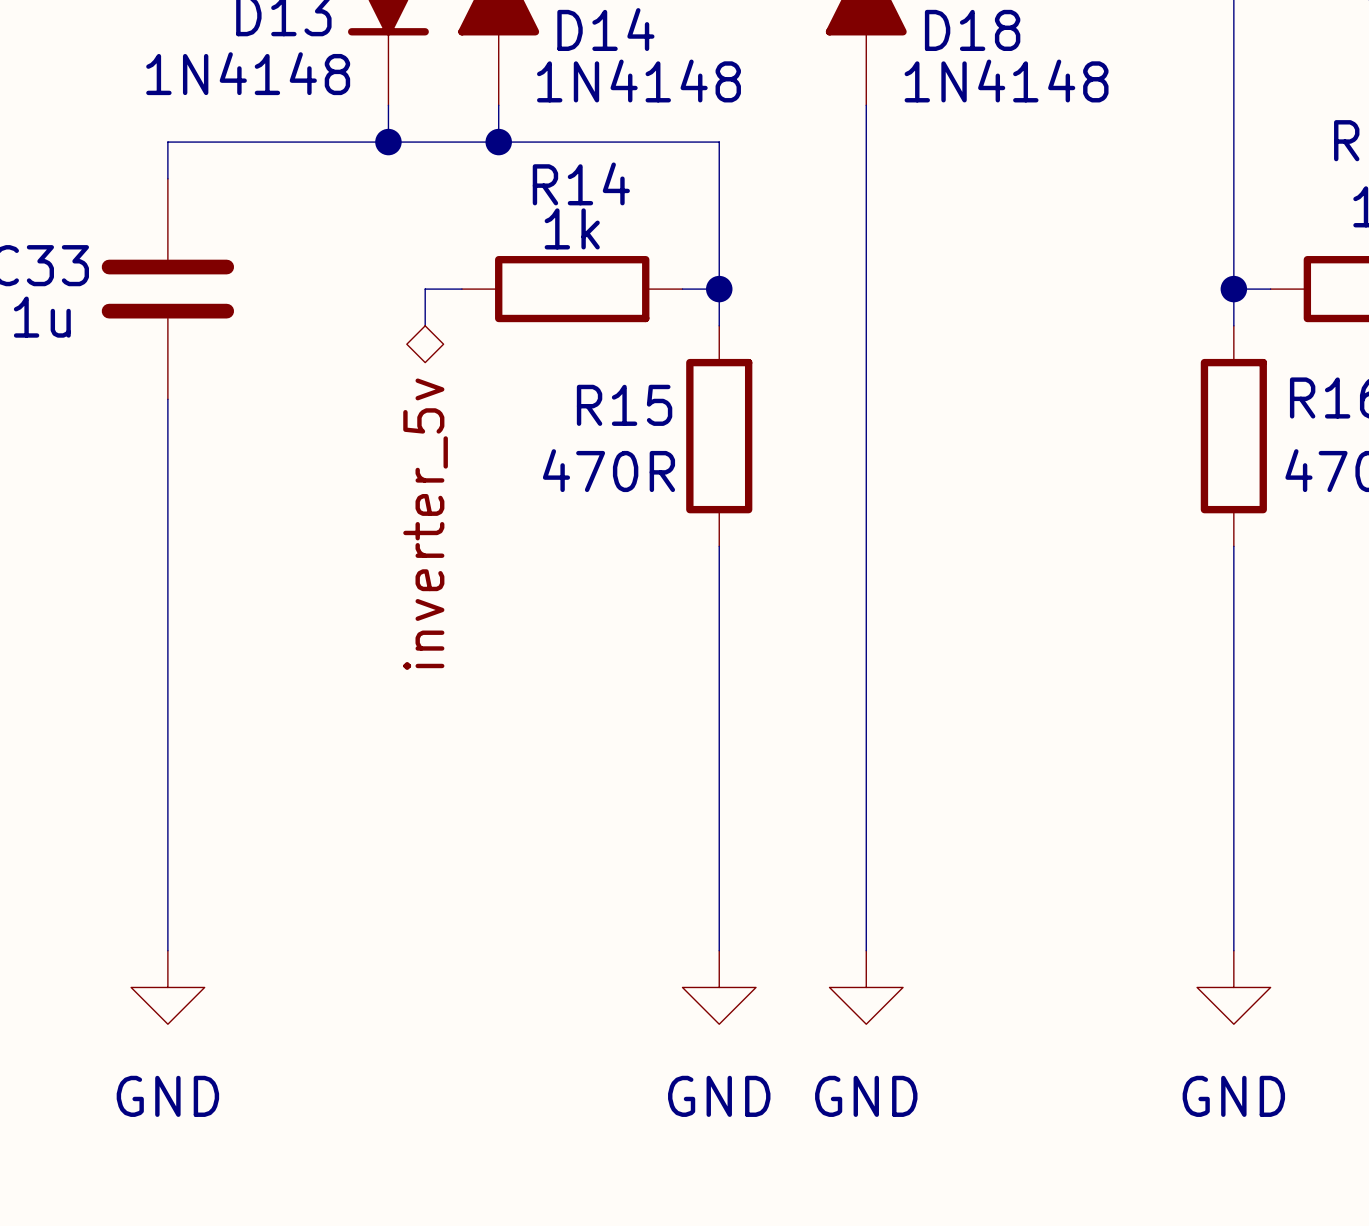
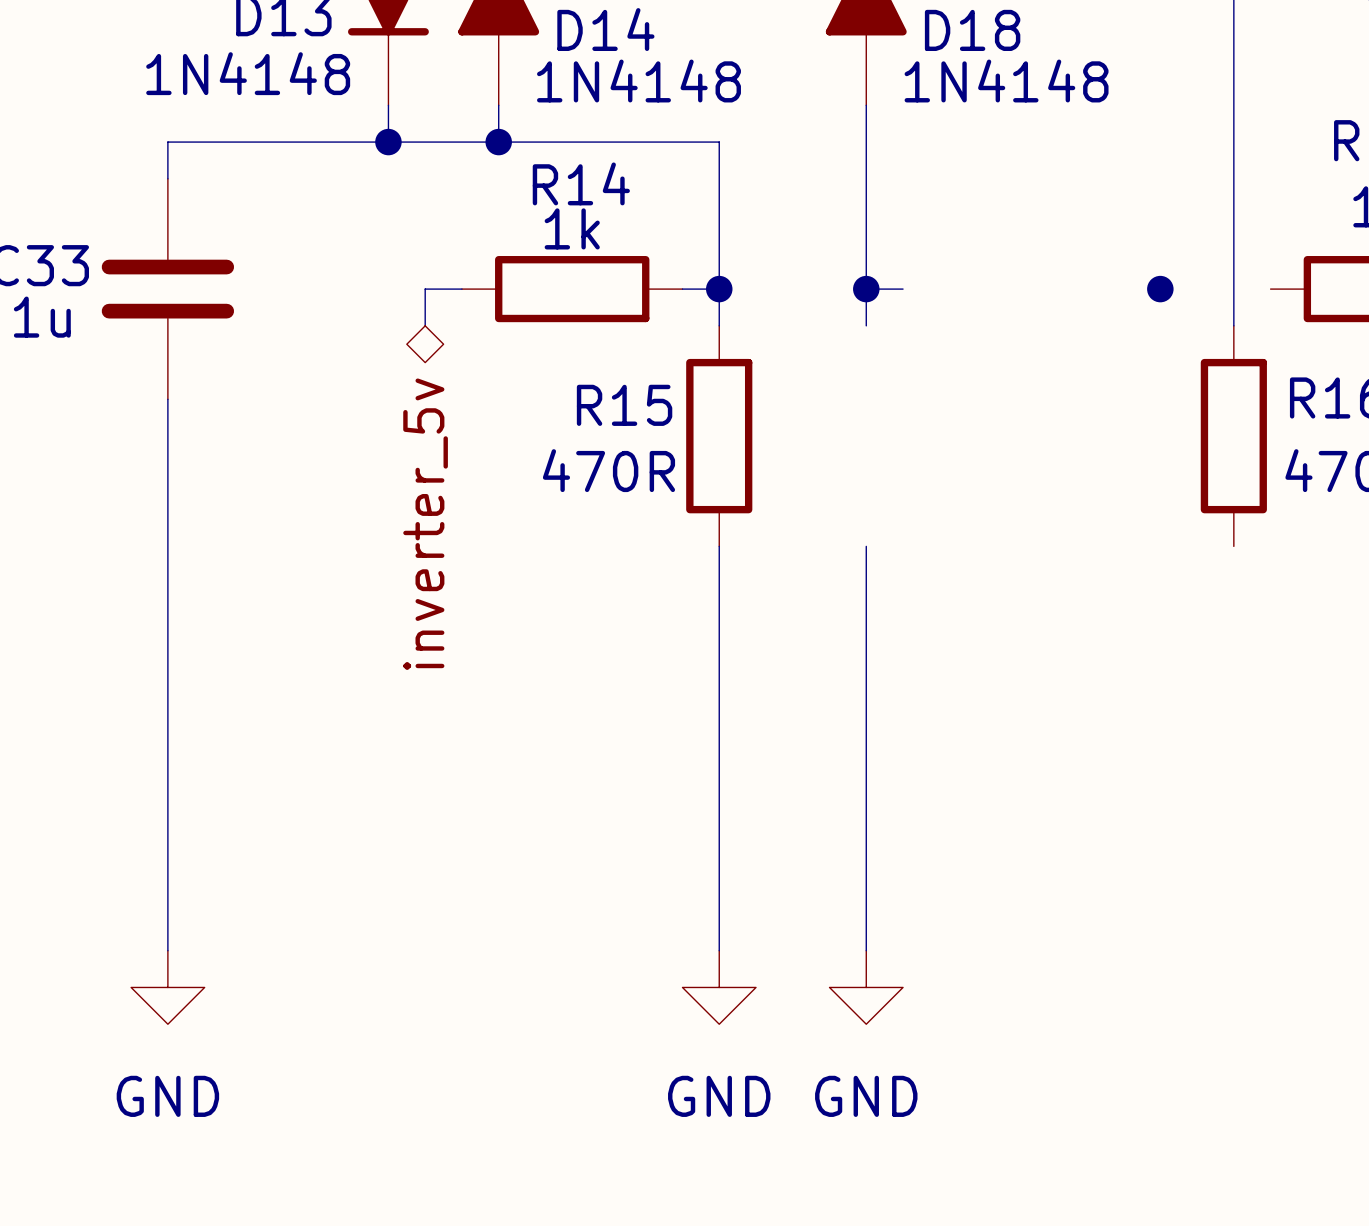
junction: none -> (866, 289)
wire: (1233, 289) (1270, 289) -> (866, 289) (903, 289)
junction position: (1233, 289) -> (1160, 289)
wire: (866, 325) (866, 546) -> none
wire: (1233, 546) (1233, 950) -> none
power symbol: GND (1233, 987) -> none

